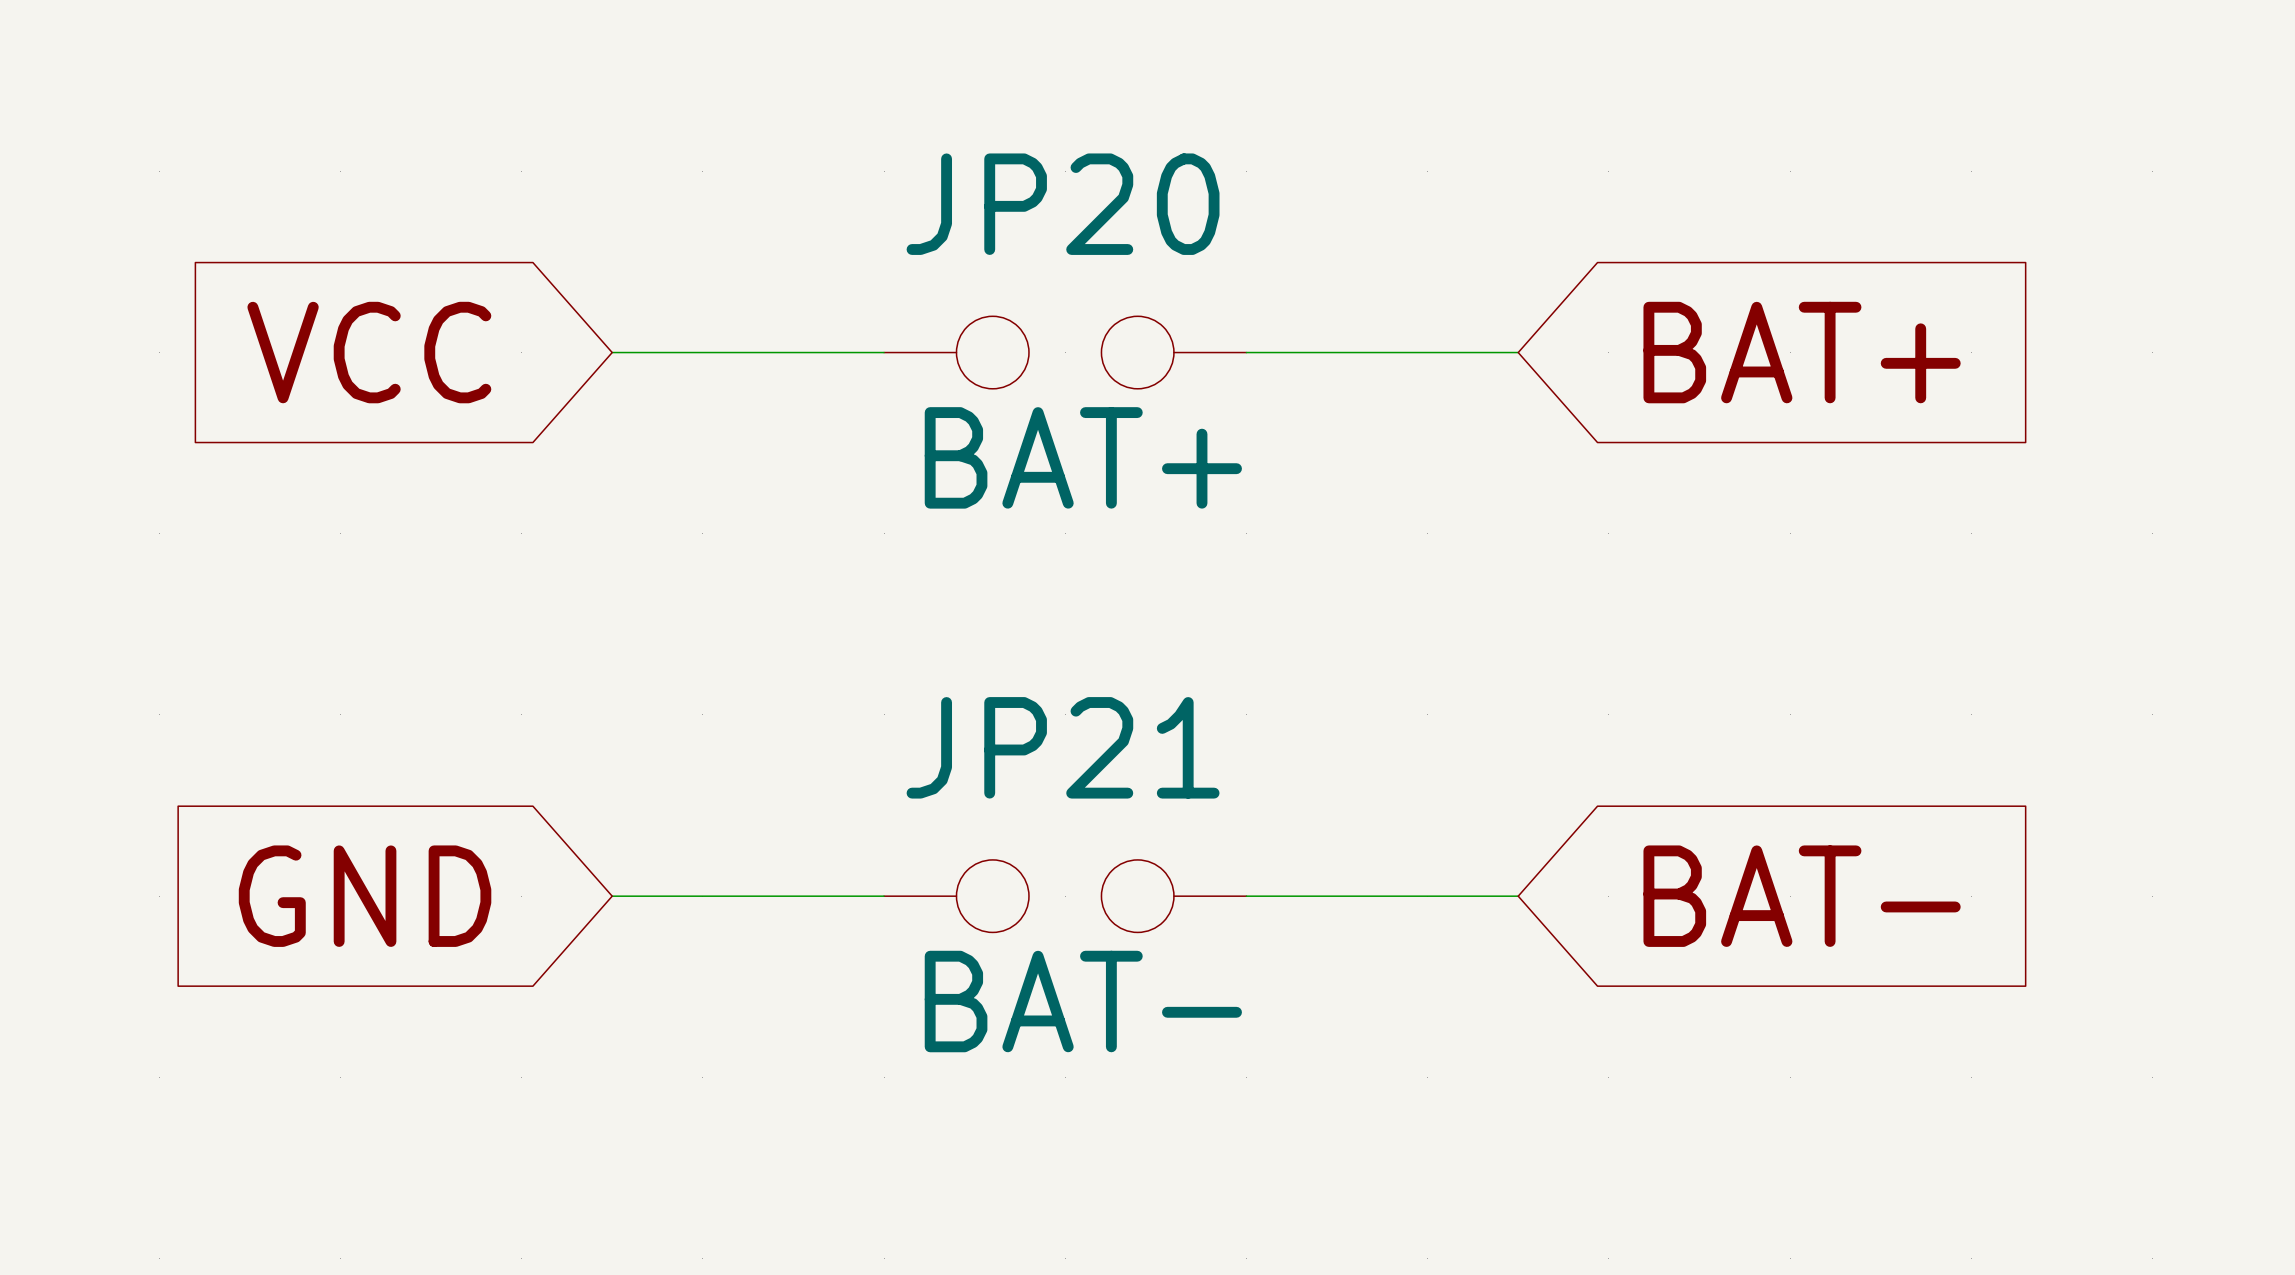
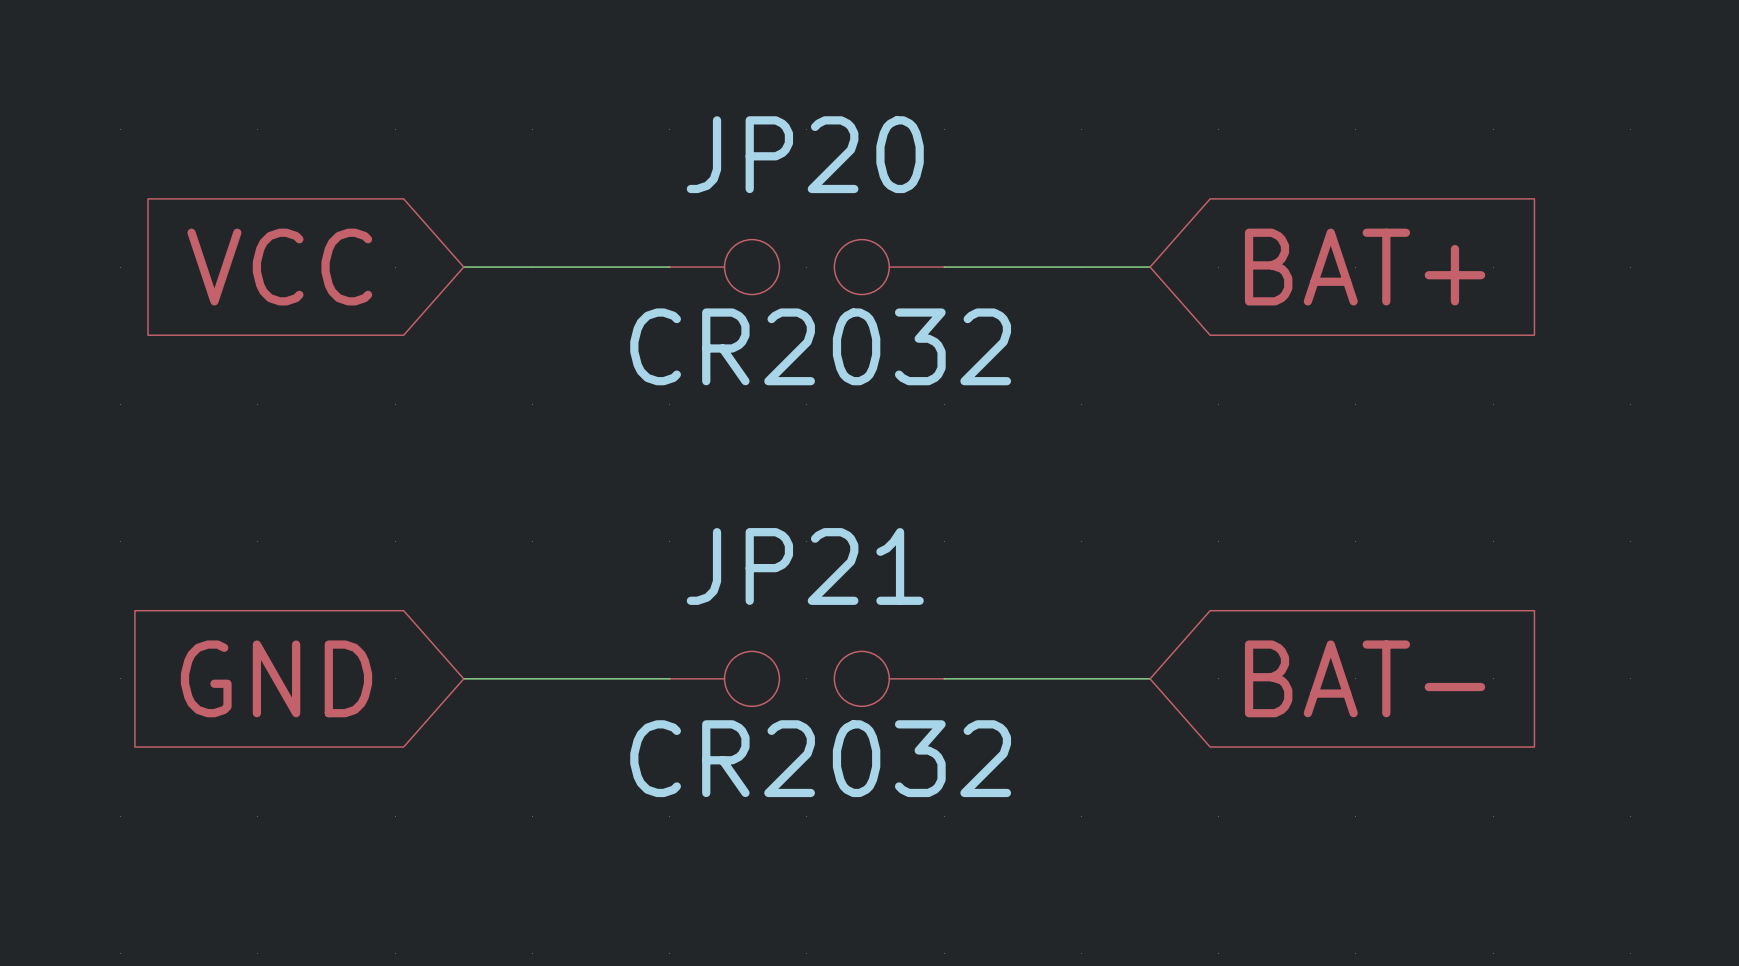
JP20 value: BAT+ (1083, 457) -> CR2032 (820, 346)
JP21 value: BAT- (1083, 1001) -> CR2032 (820, 758)

